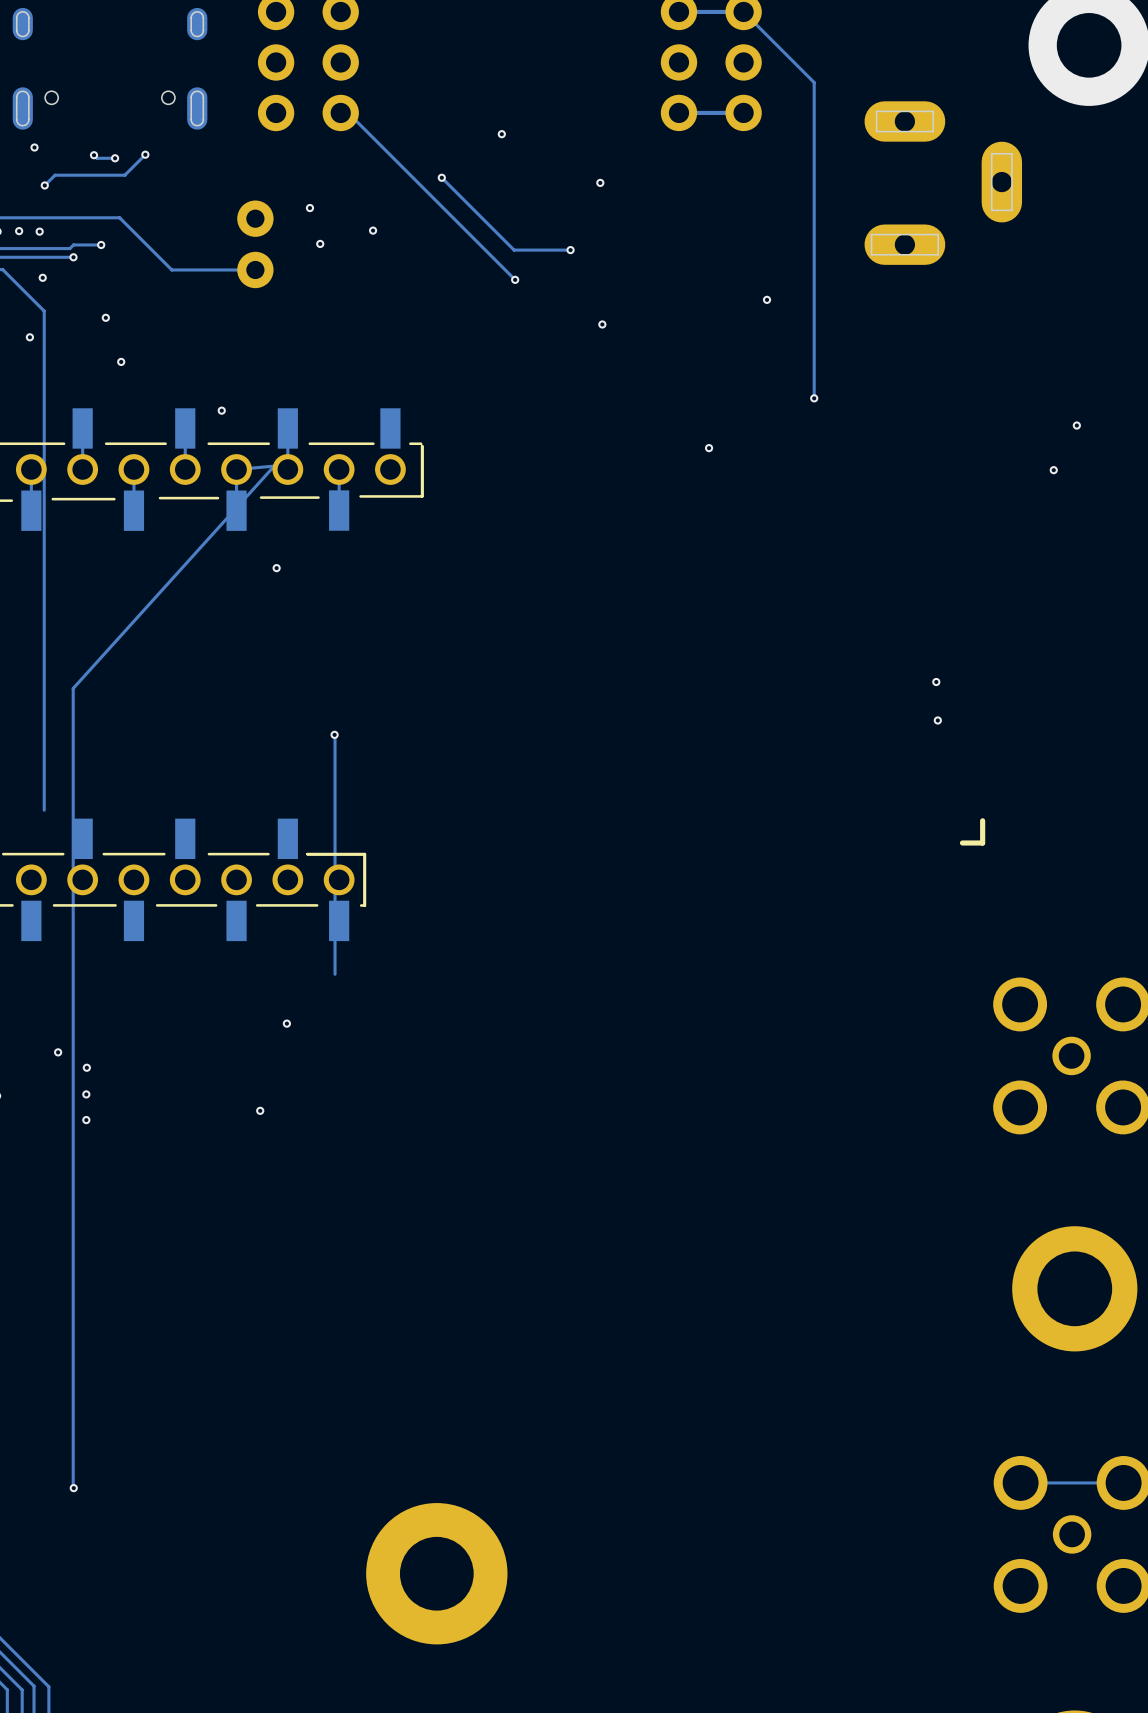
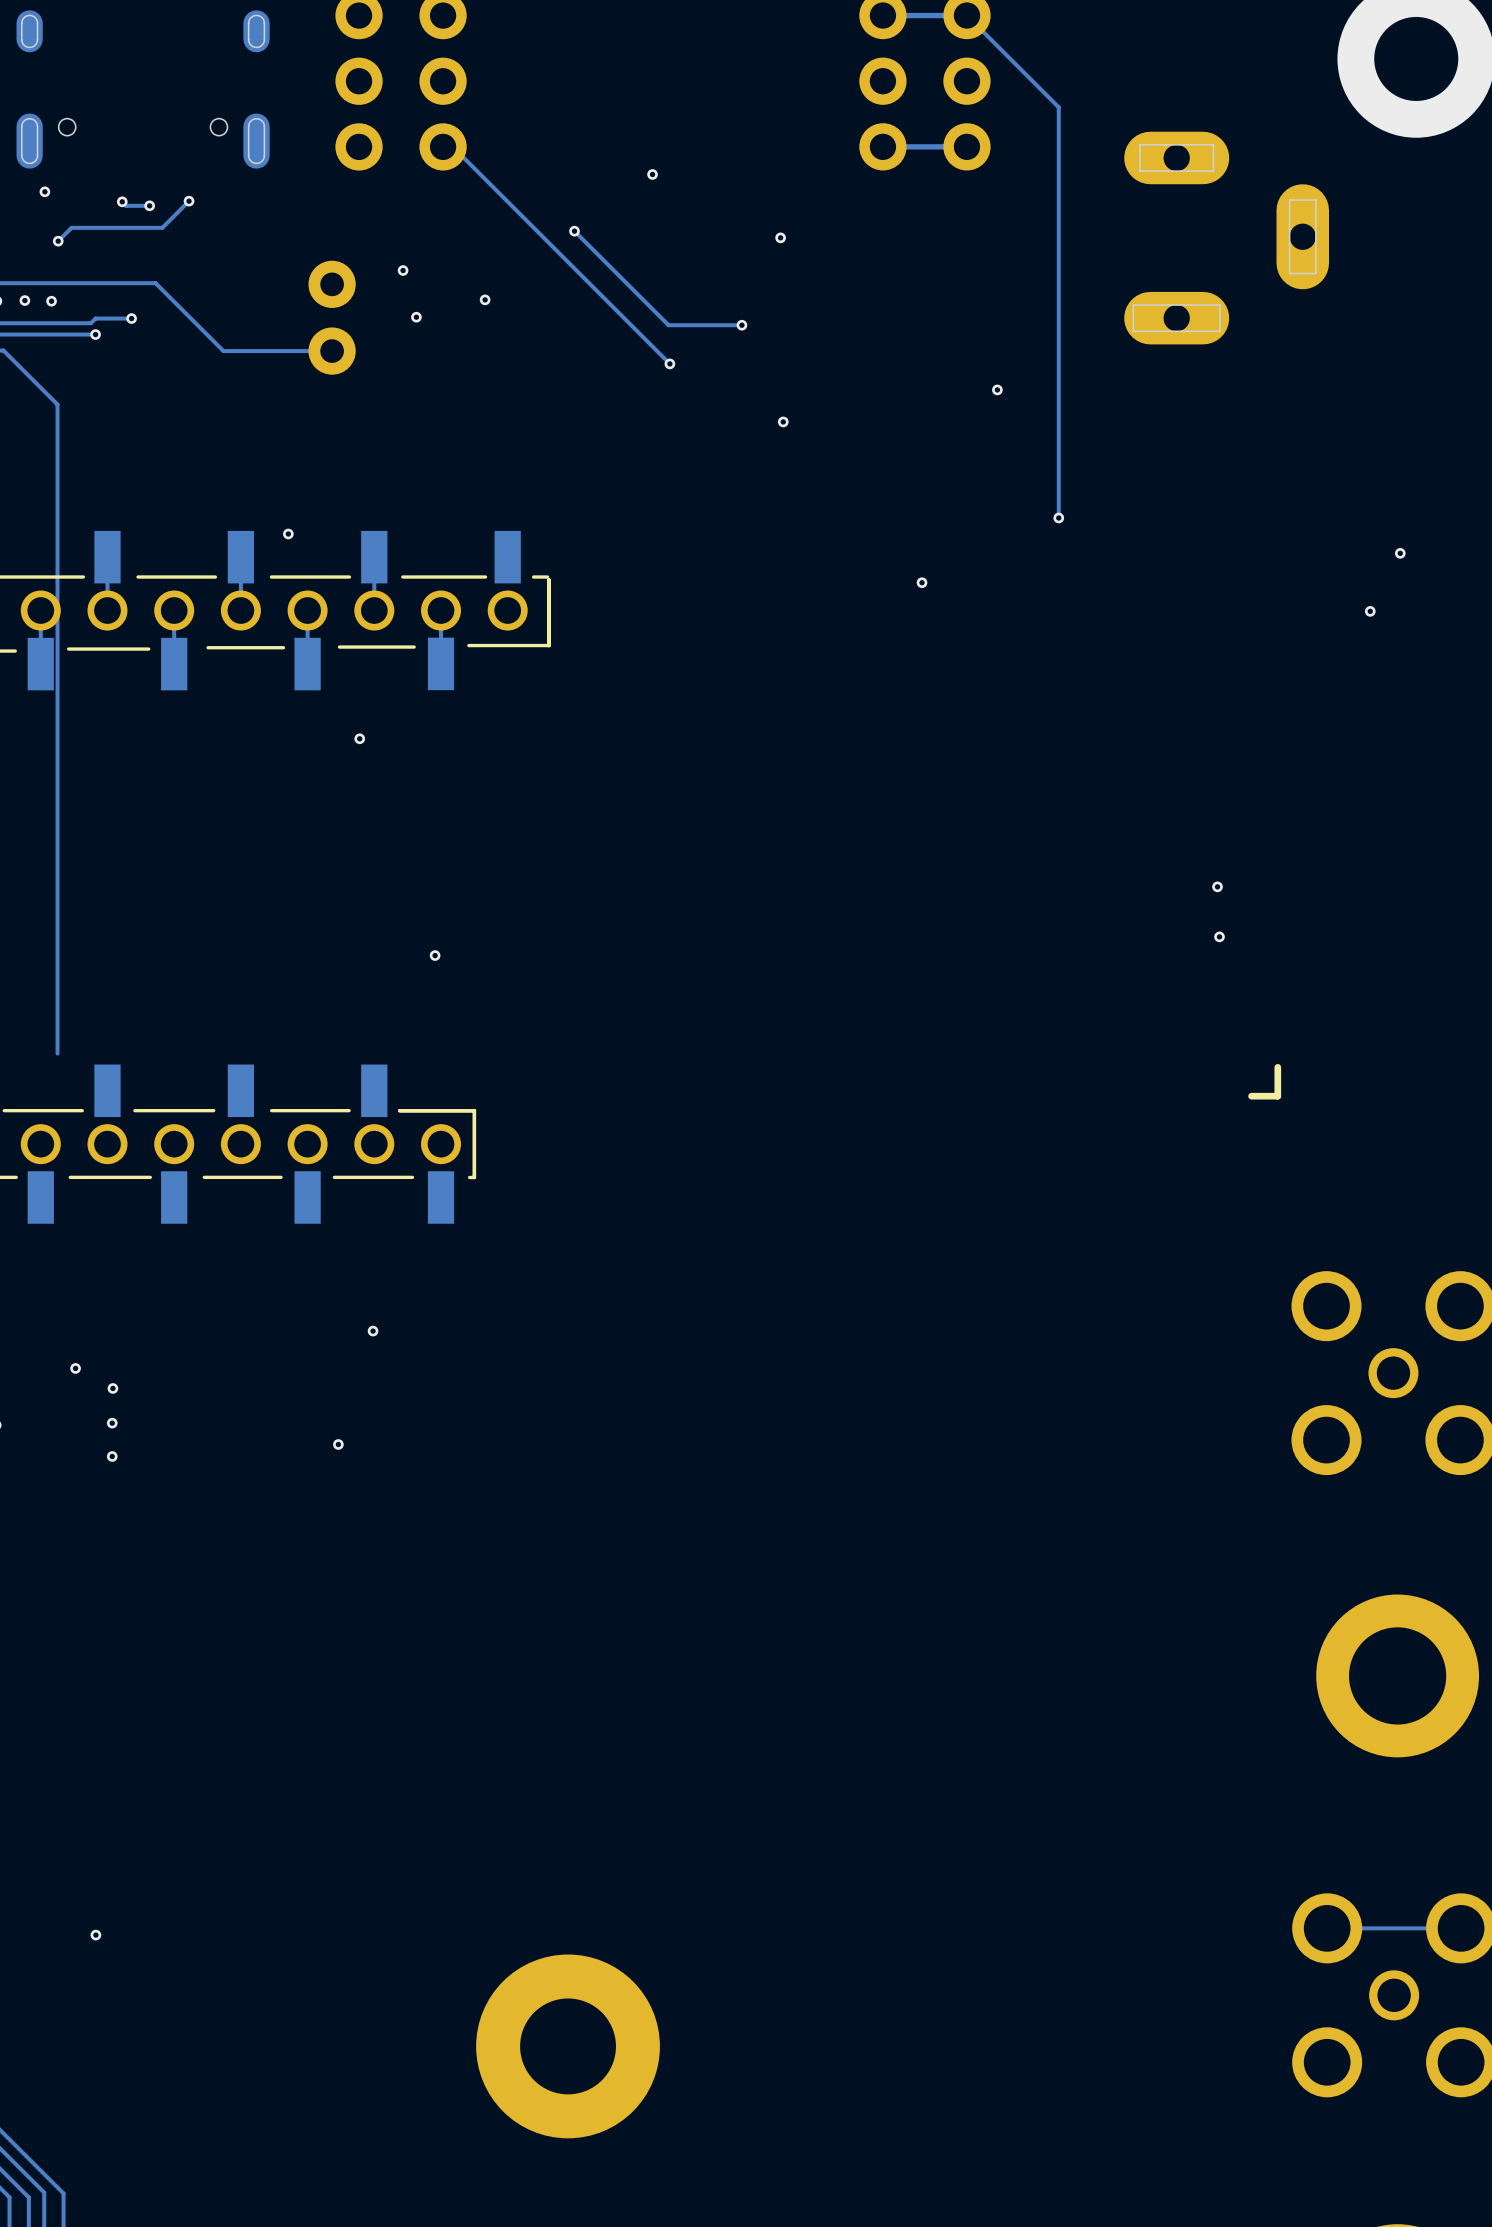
via: (42, 277) -> none
via: (105, 317) -> none
via: (29, 337) -> none
via: (121, 361) -> none
track: (236, 469) (274, 466) (73, 688) (73, 1487) -> none
track: (334, 734) (335, 974) -> none

